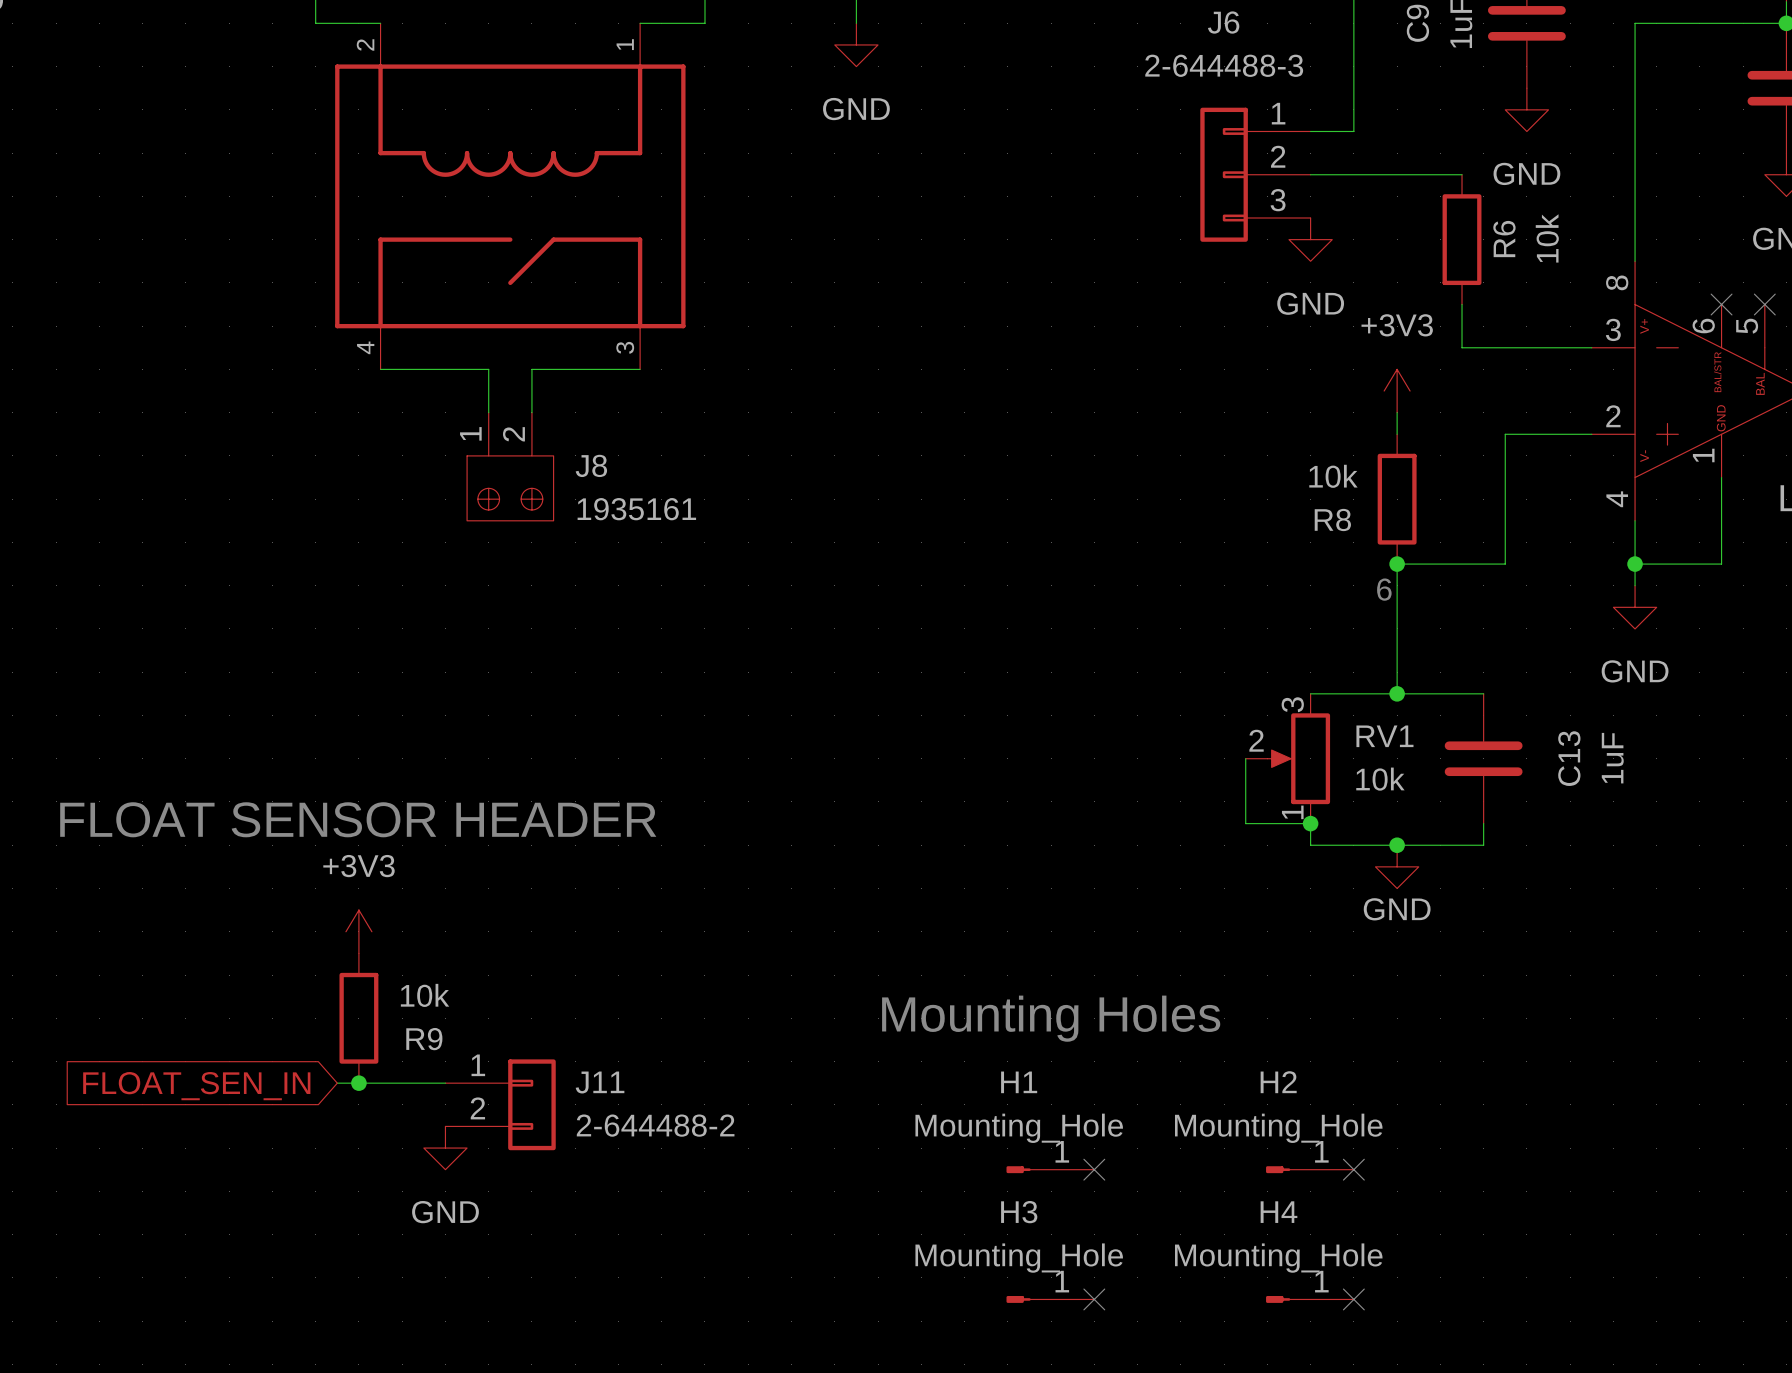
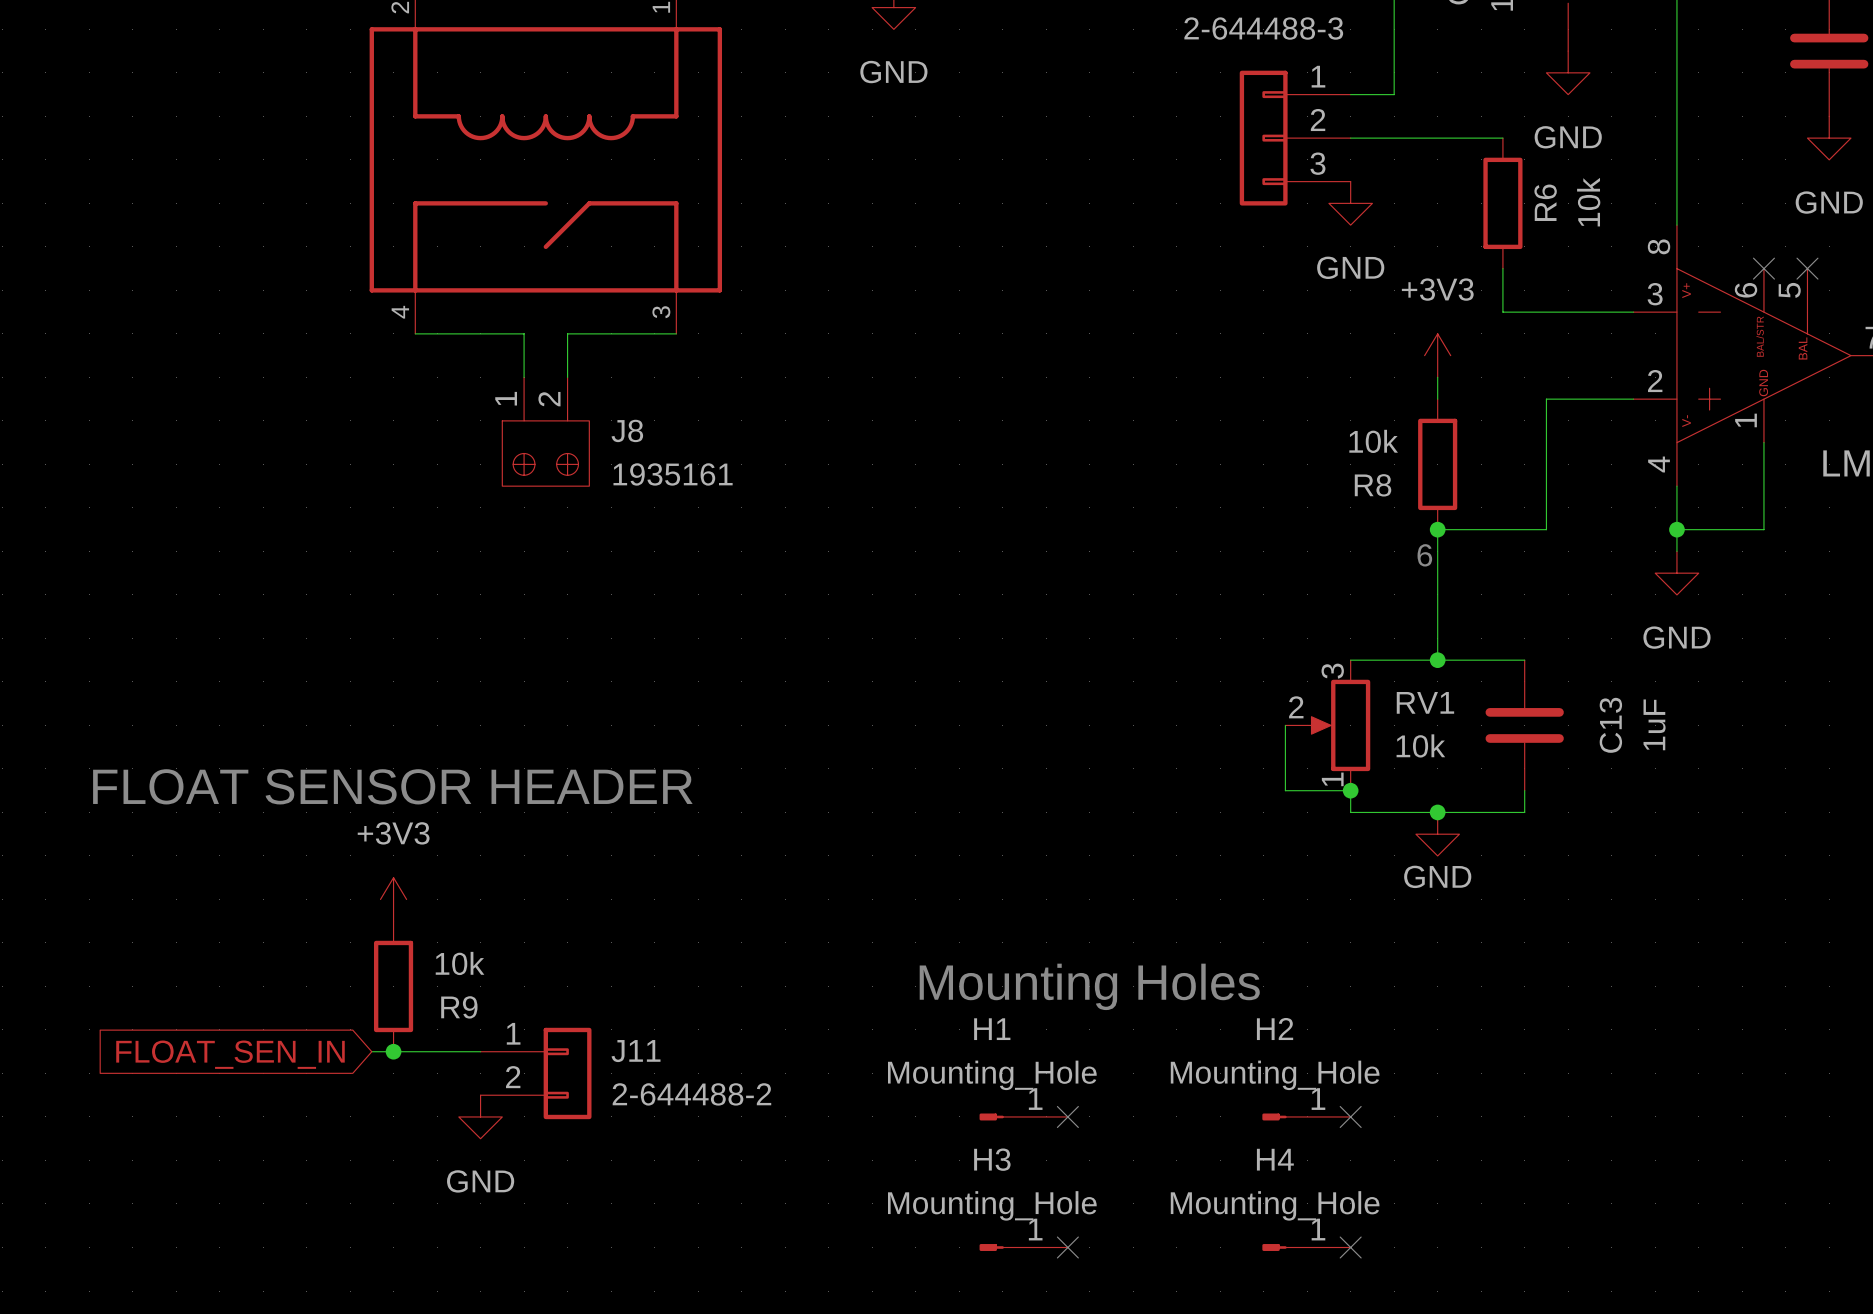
no-connect mark: none -> (1067, 1116)
H1 position: (1050, 1169) -> (1023, 1116)
no-connect mark: (1094, 1169) -> none
H2 position: (1309, 1169) -> (1306, 1116)
no-connect mark position: (1353, 1169) -> (1350, 1116)
no-connect mark: none -> (1067, 1247)
H3 position: (1050, 1299) -> (1023, 1247)
no-connect mark: (1094, 1299) -> none
H4 position: (1309, 1299) -> (1306, 1247)
no-connect mark position: (1353, 1299) -> (1350, 1247)

